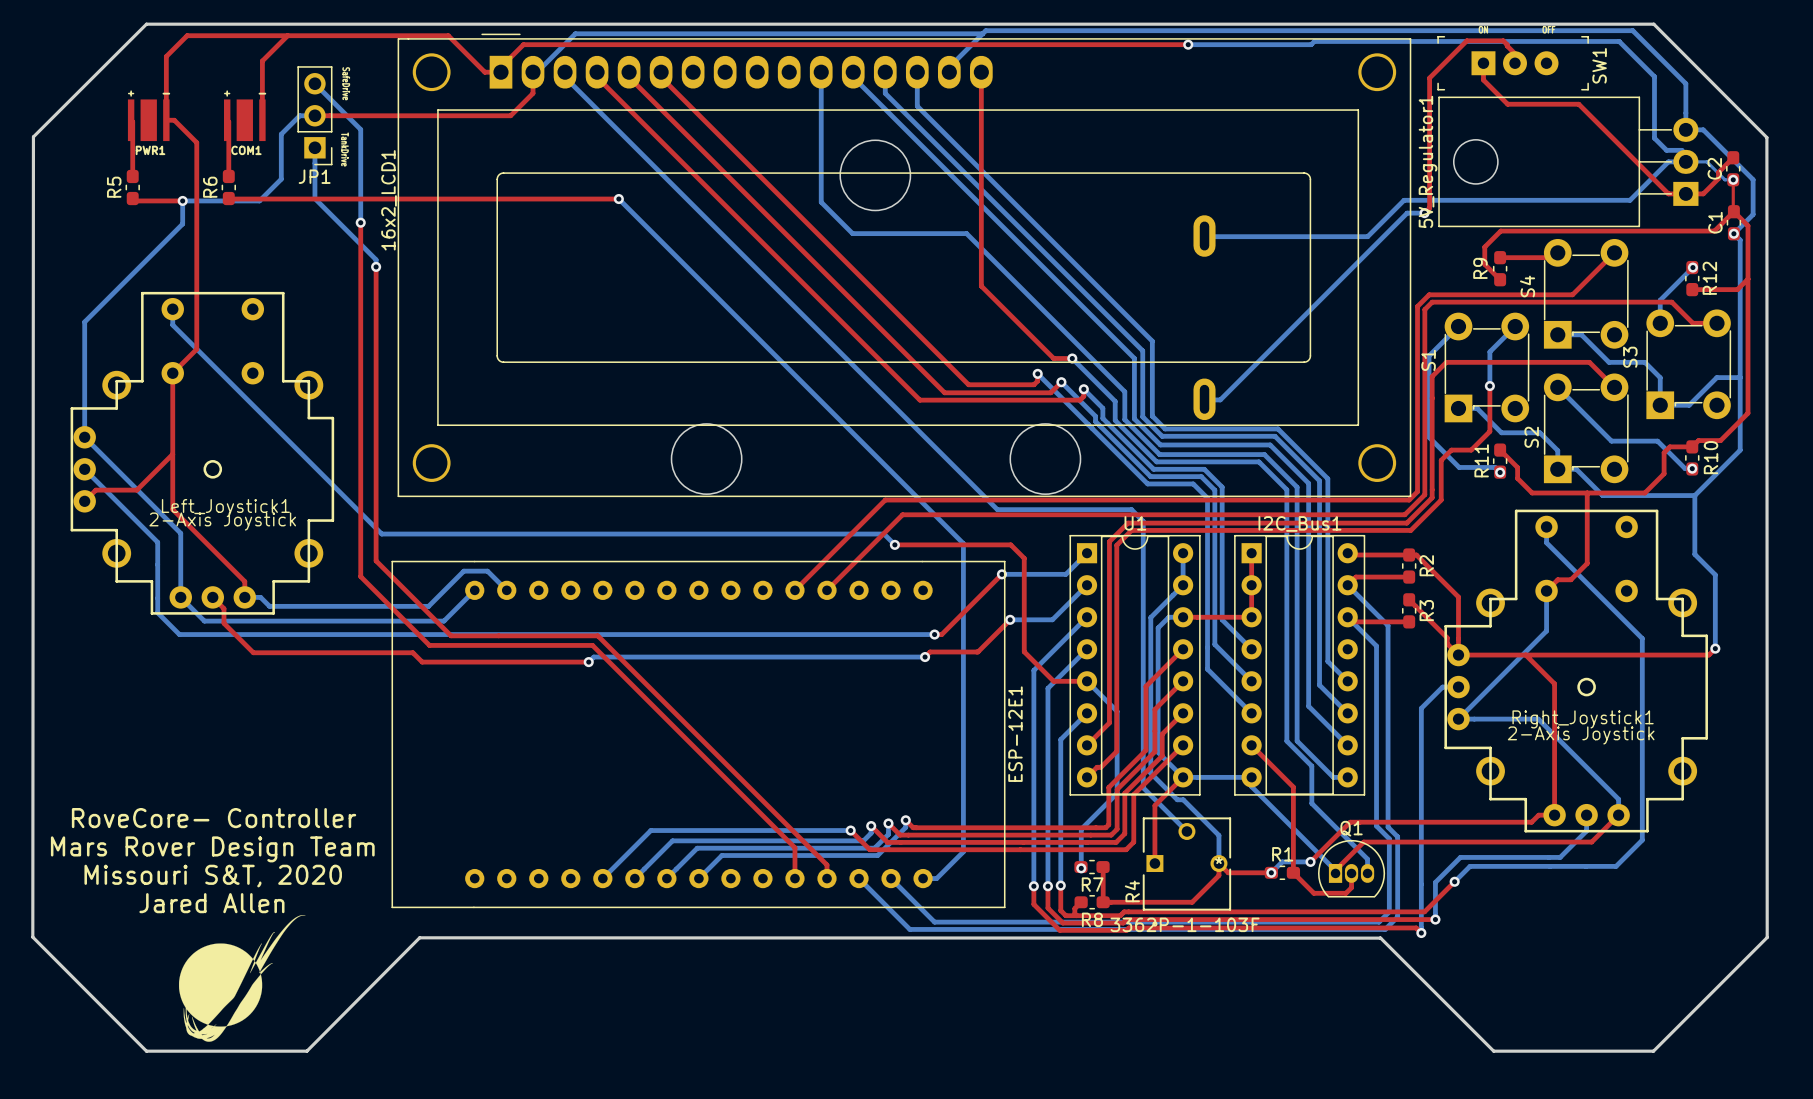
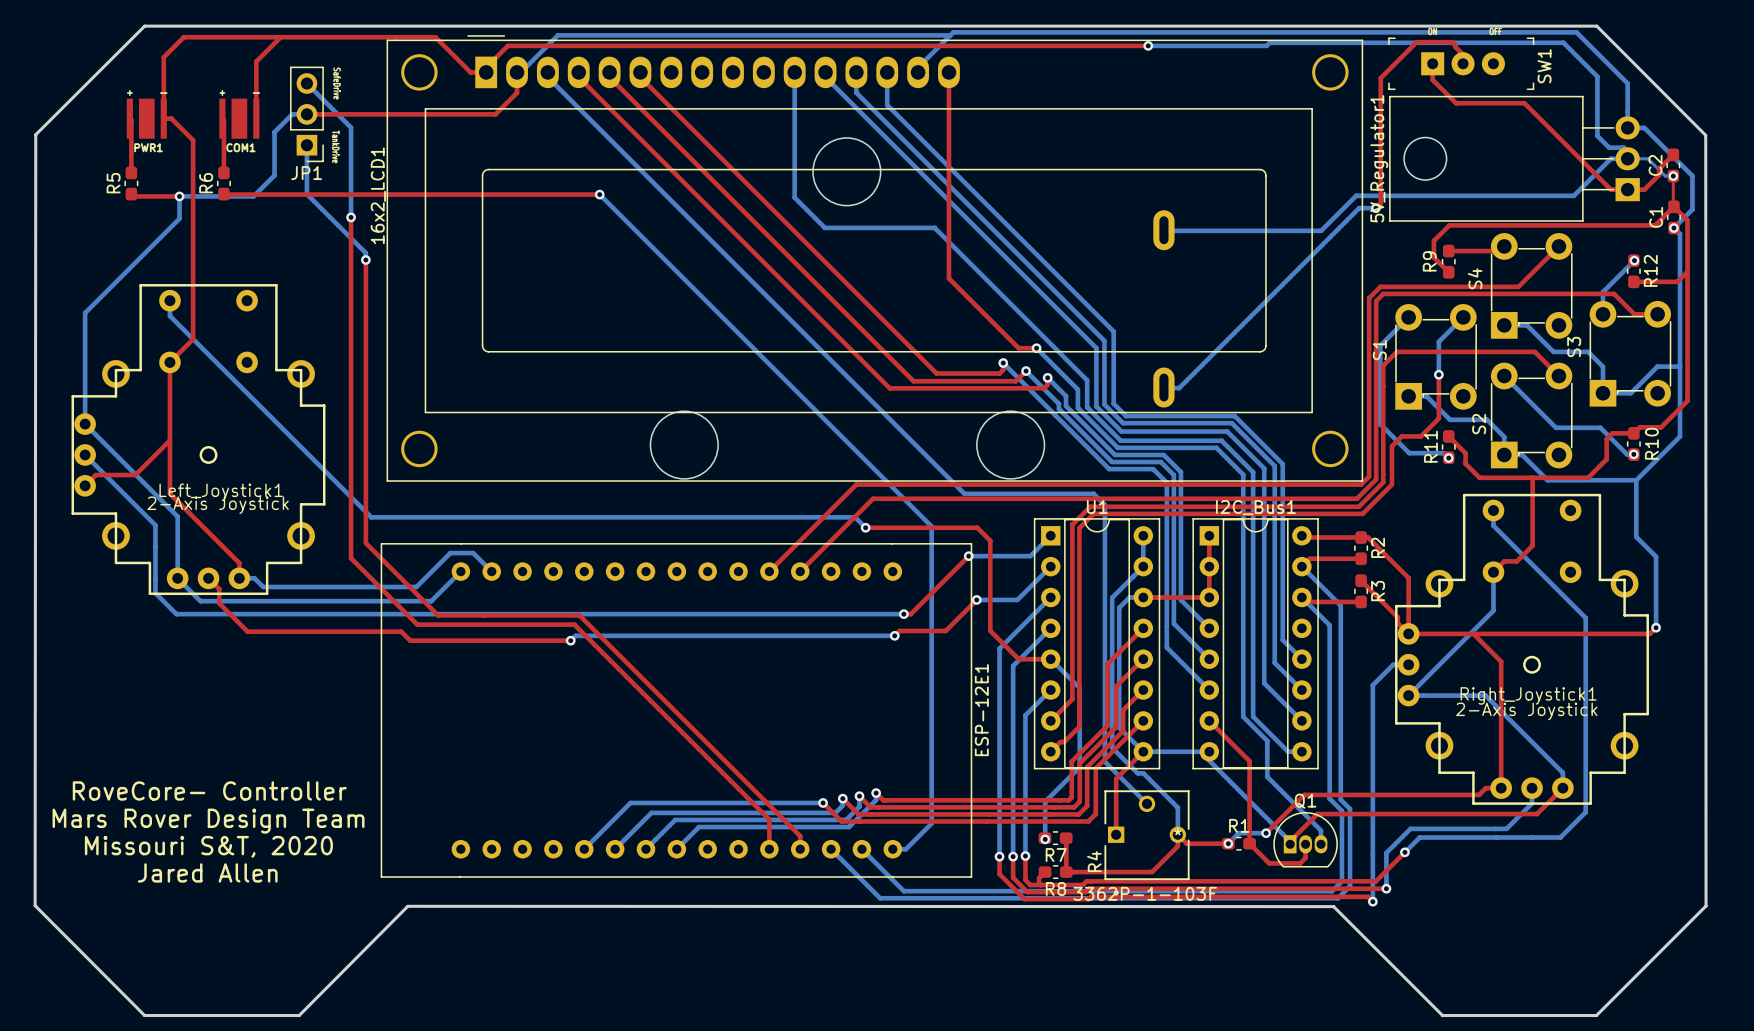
drawing: [178, 915, 306, 1042] -> none

